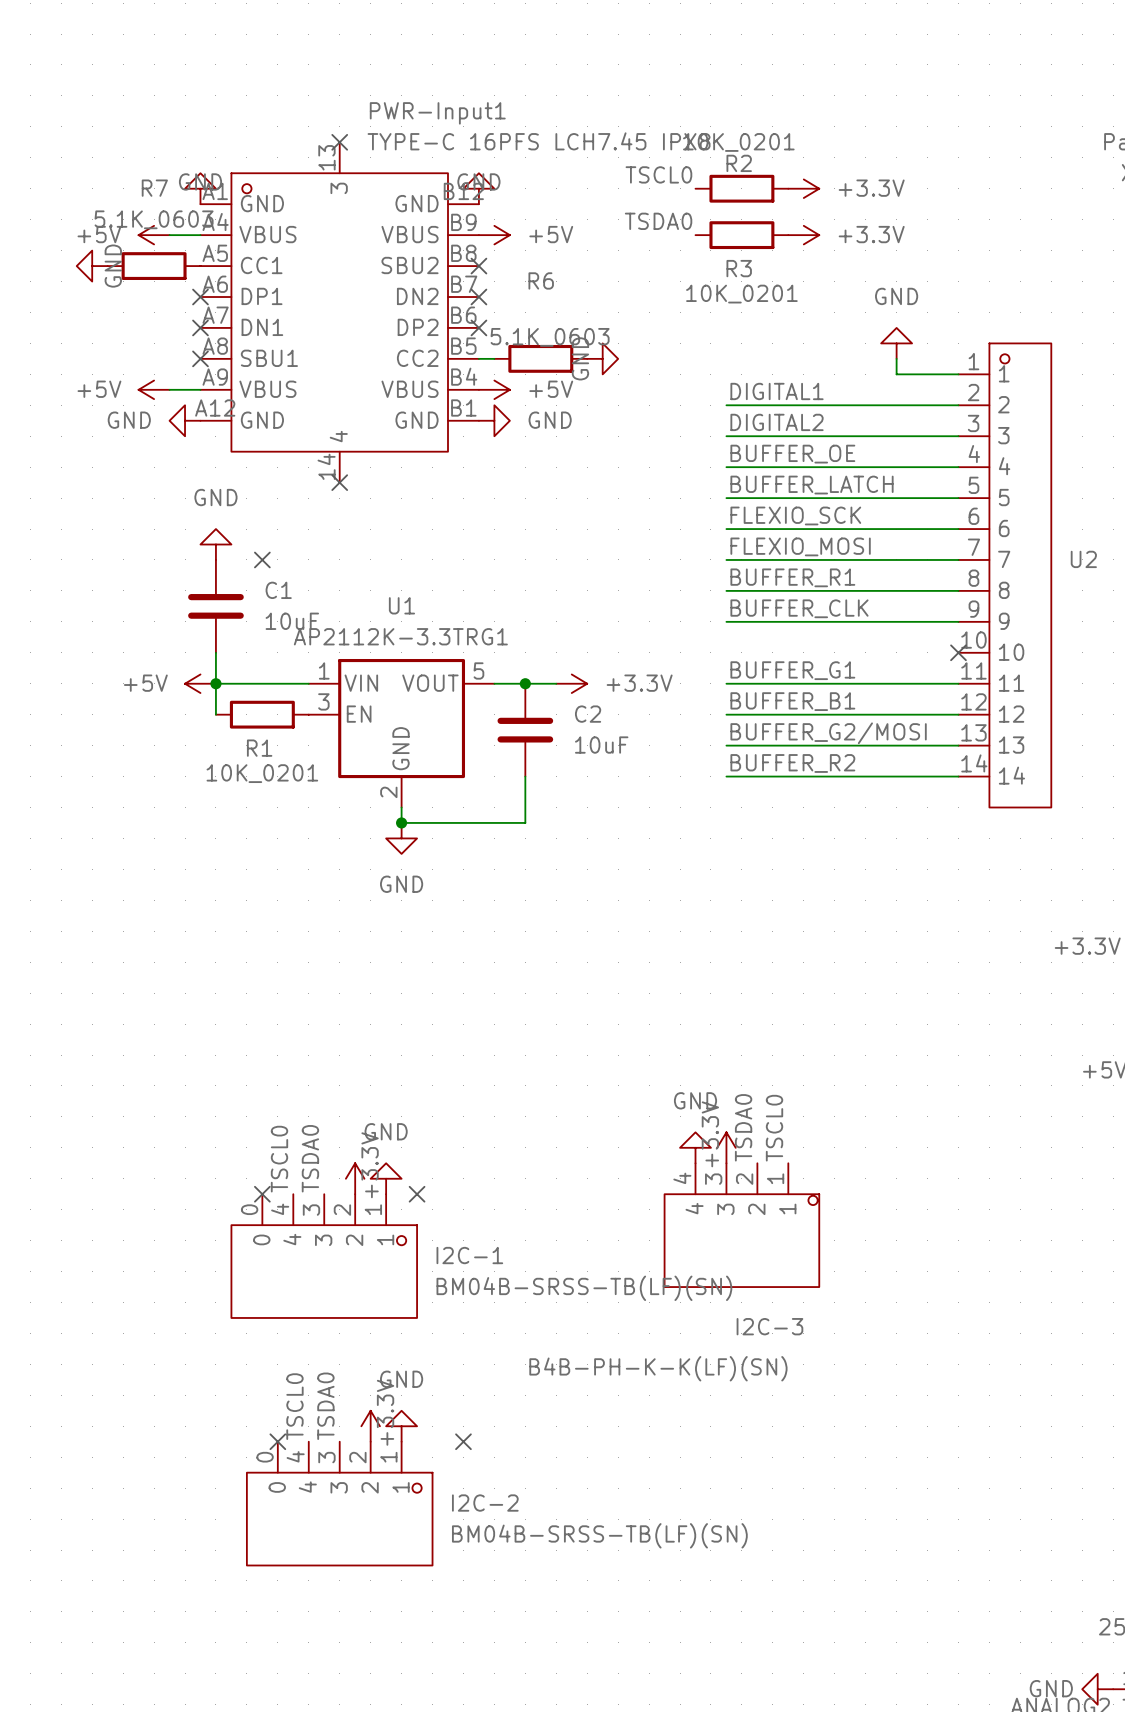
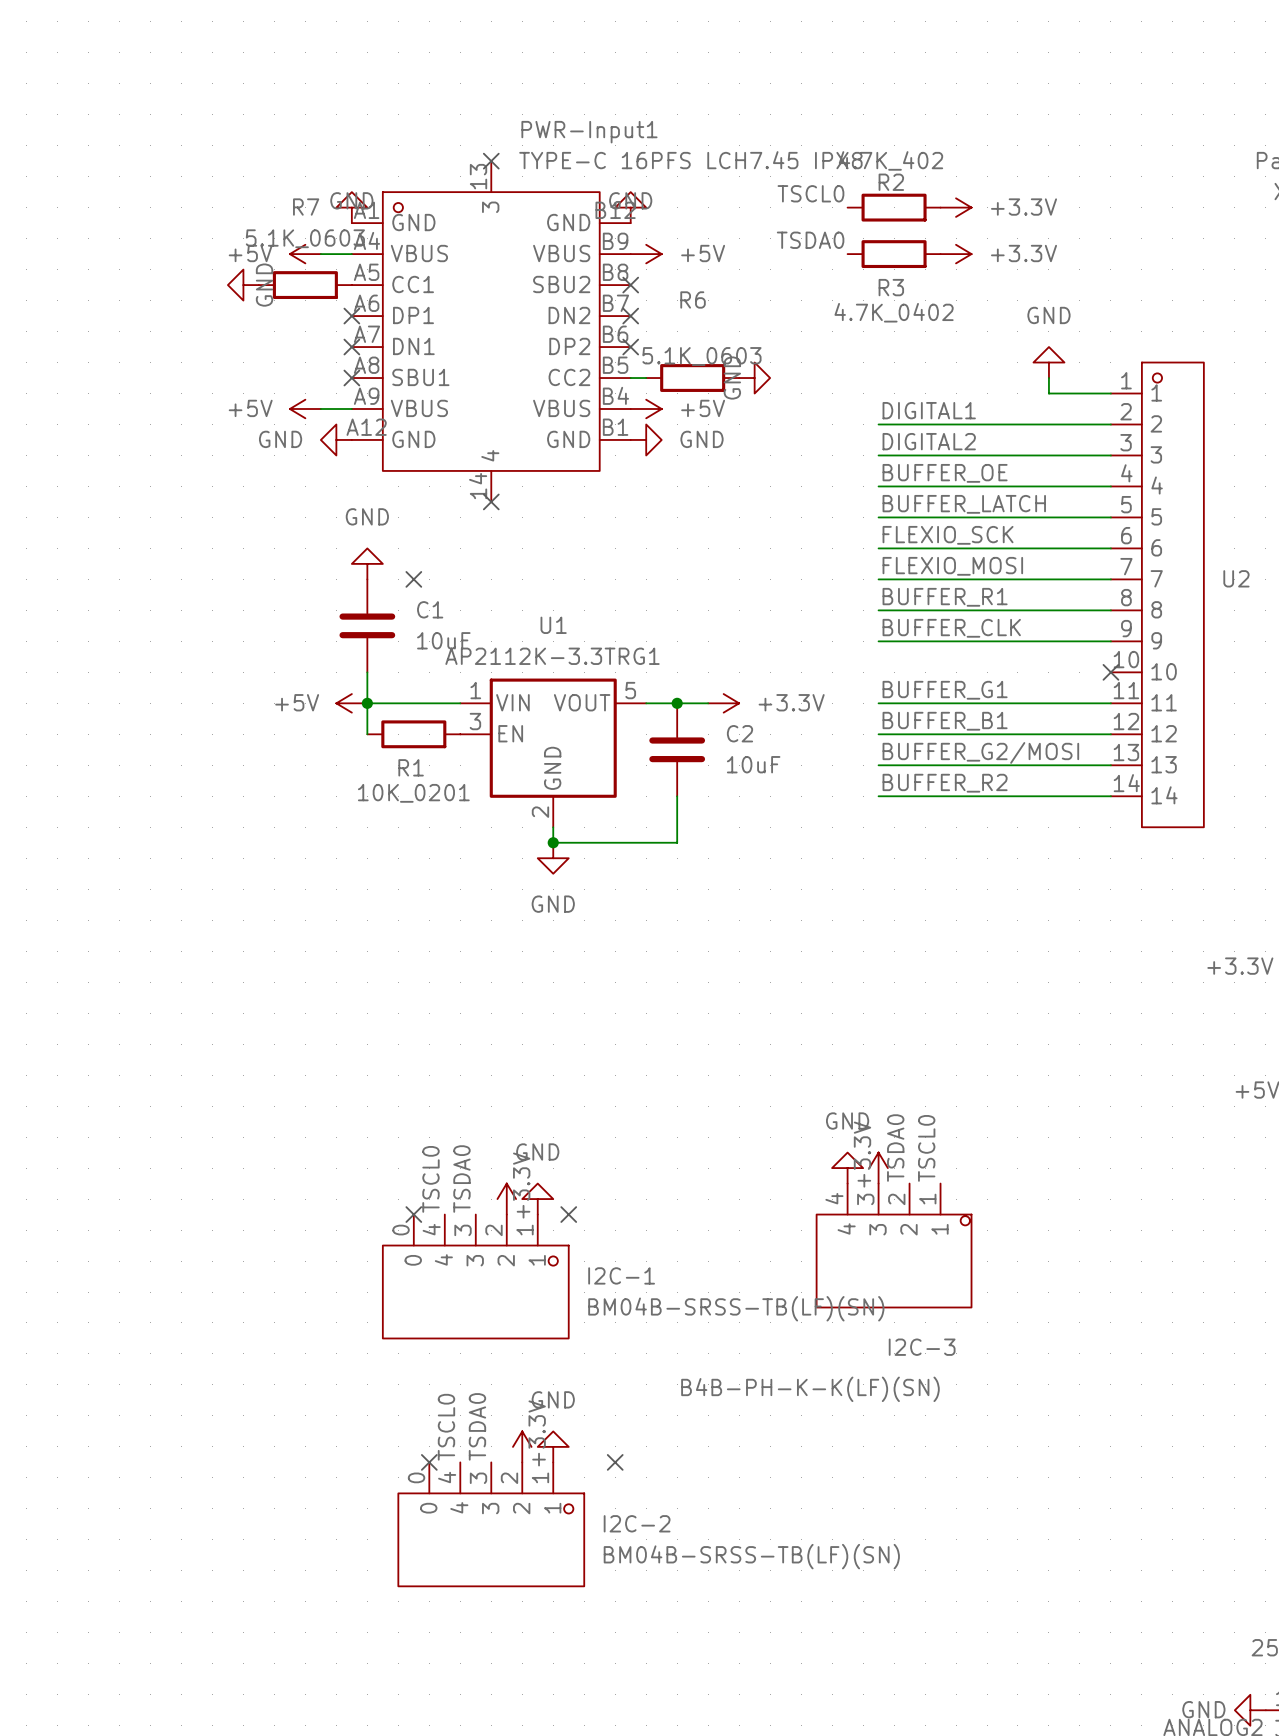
R2 value: 10K_0201 (738, 142) -> 4.7K_402 (890, 160)
R3 value: 10K_0201 (741, 294) -> 4.7K_0402 (894, 312)

